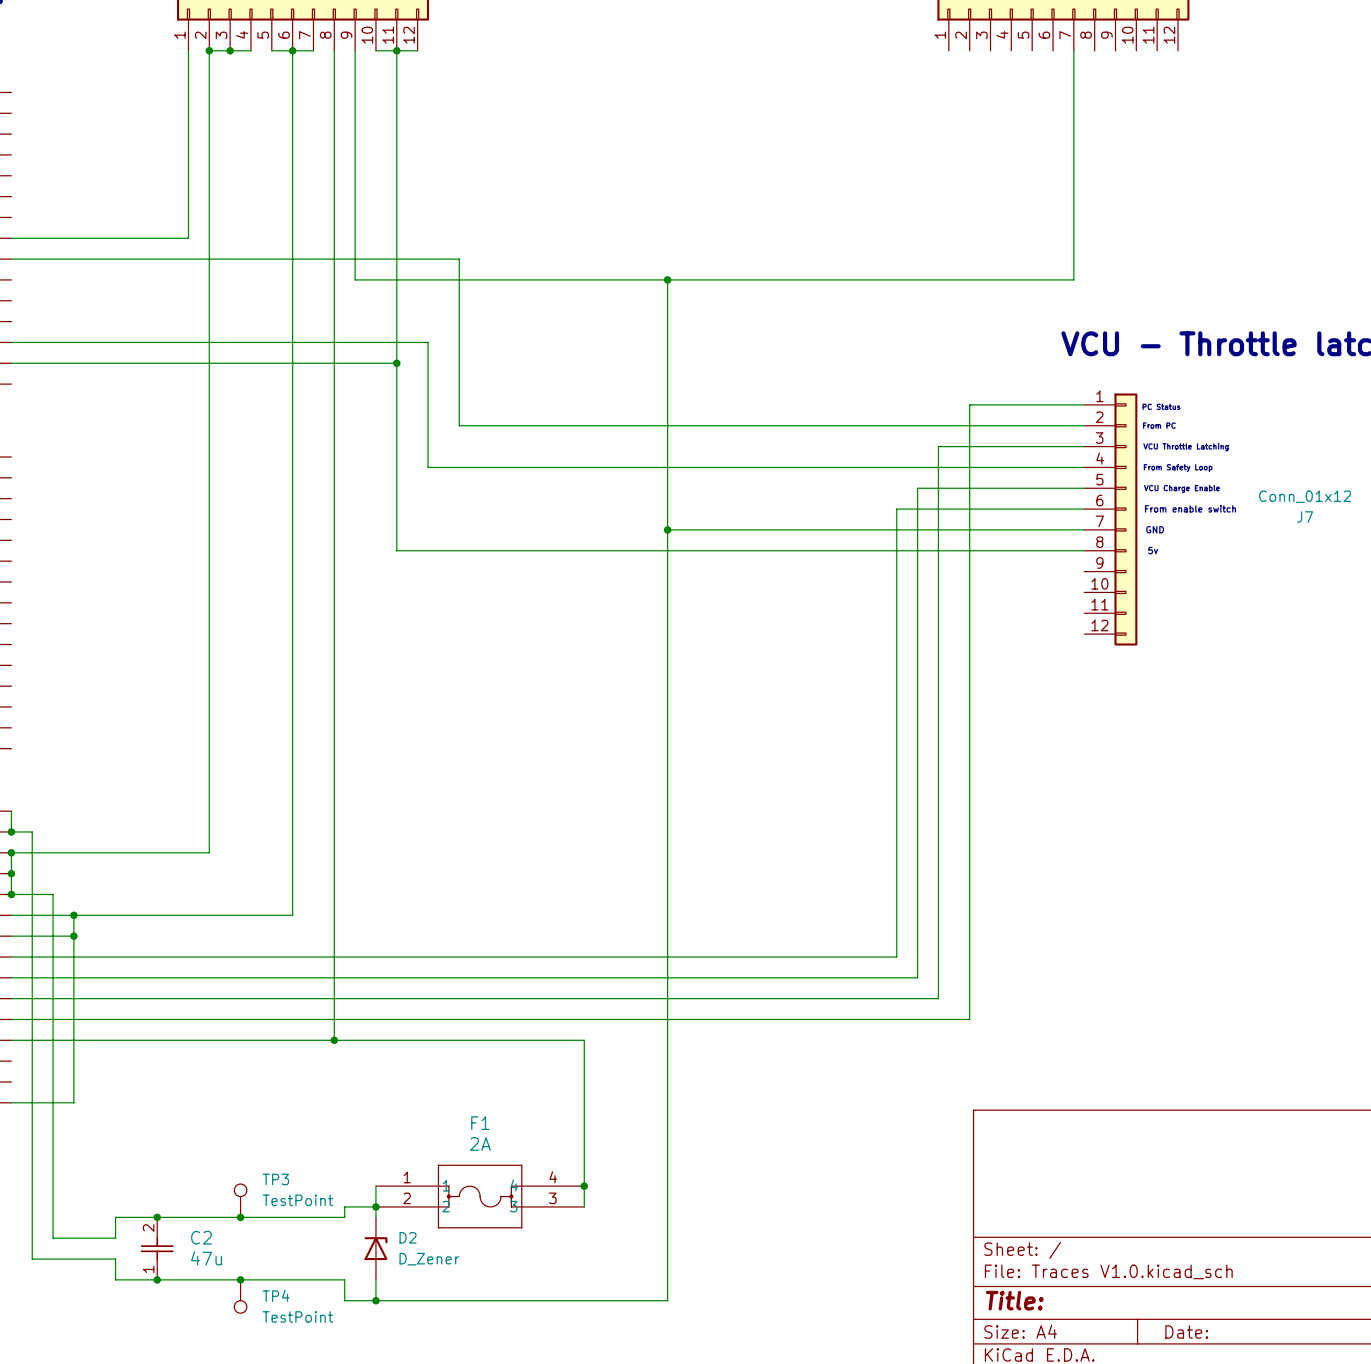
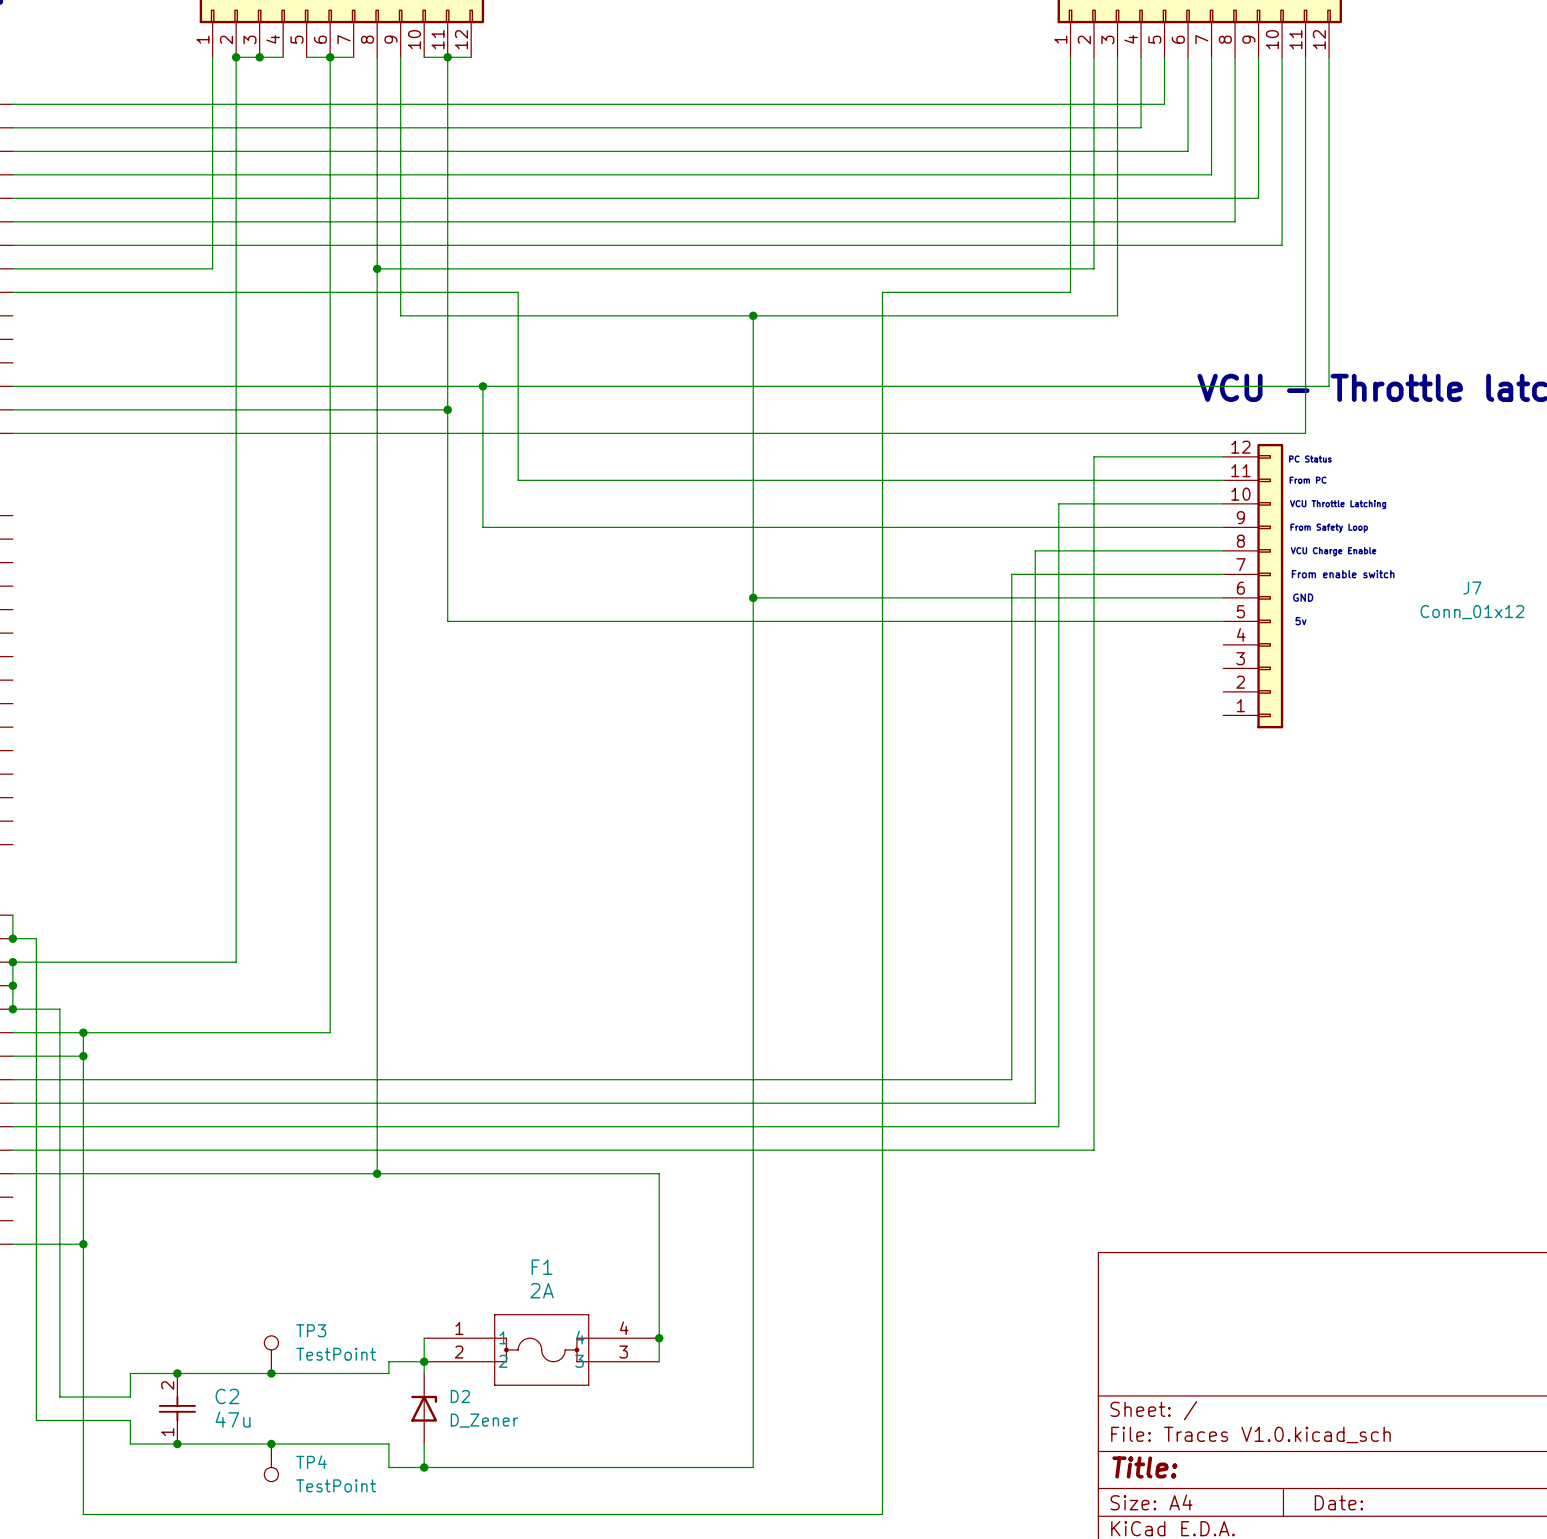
wire: none -> (1070, 57) (1070, 292) (882, 292) (882, 1514) (83, 1514) (83, 1244)
wire: none -> (1094, 57) (1094, 268) (377, 268)
wire: none -> (1141, 57) (1141, 127) (12, 127)
wire: none -> (1164, 57) (1164, 104) (12, 104)
wire: none -> (1188, 57) (1188, 151) (12, 151)
wire: none -> (1235, 57) (1235, 221) (12, 221)
wire: none -> (1258, 57) (1258, 198) (12, 198)
wire: none -> (1282, 57) (1282, 245) (12, 245)
wire: none -> (1305, 57) (1305, 433) (12, 433)
wire: none -> (1329, 57) (1329, 386) (482, 386)
wire: none -> (12, 174) (1211, 174)
wire: (1073, 154) (1073, 279) (990, 279) -> (1117, 57) (1117, 315)
junction: none -> (377, 268)
junction: none -> (482, 386)
J7 flip: as is (1125, 519) -> up-down (1270, 586)
junction: none -> (83, 1244)

